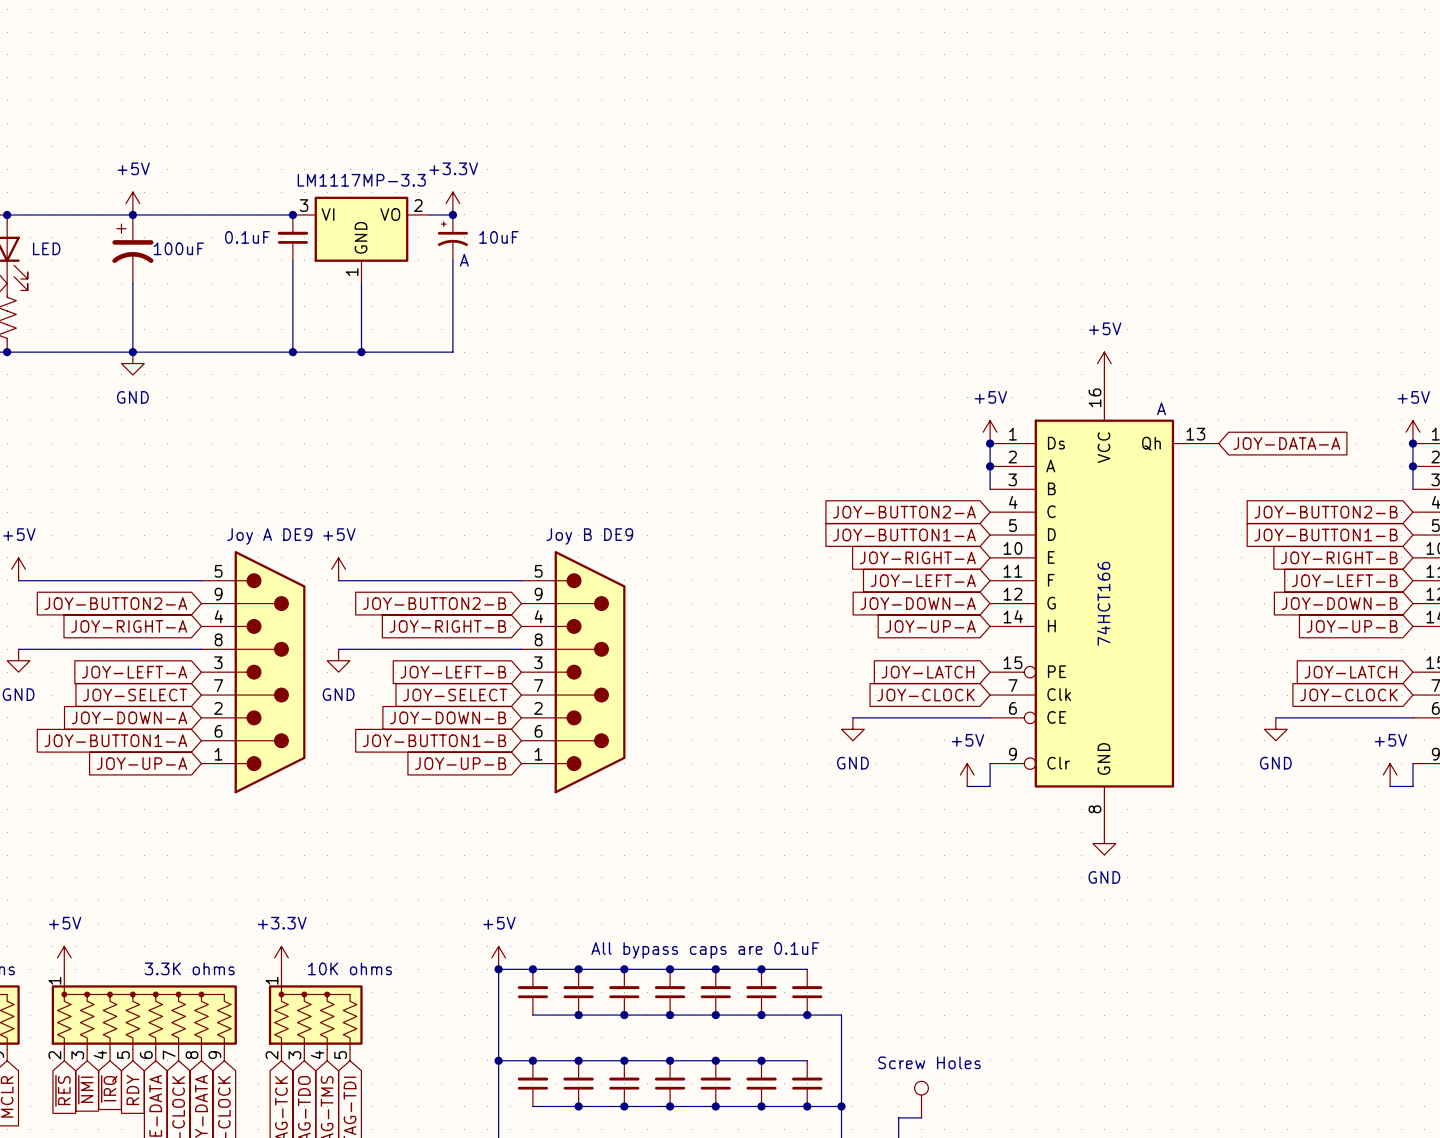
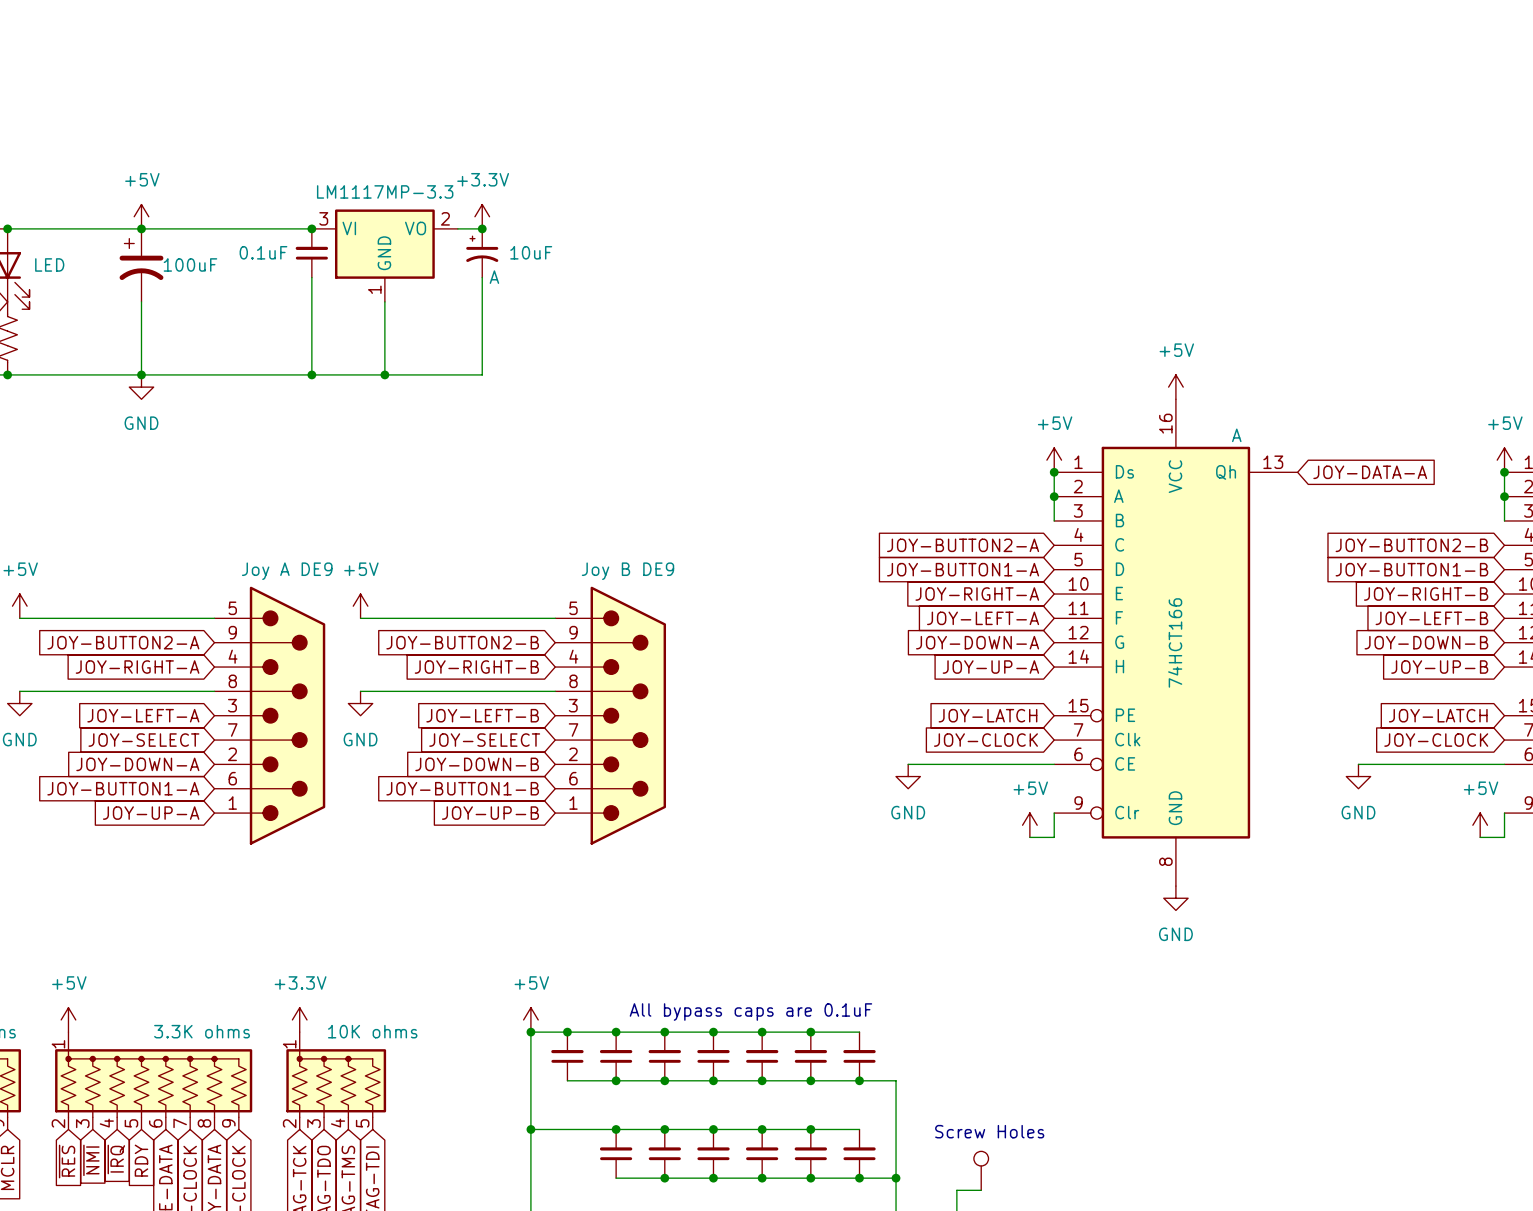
junction: (532, 1060) -> none
part: (532, 1083) -> none
wire: (532, 1106) (578, 1106) -> none
junction: (578, 1106) -> none

